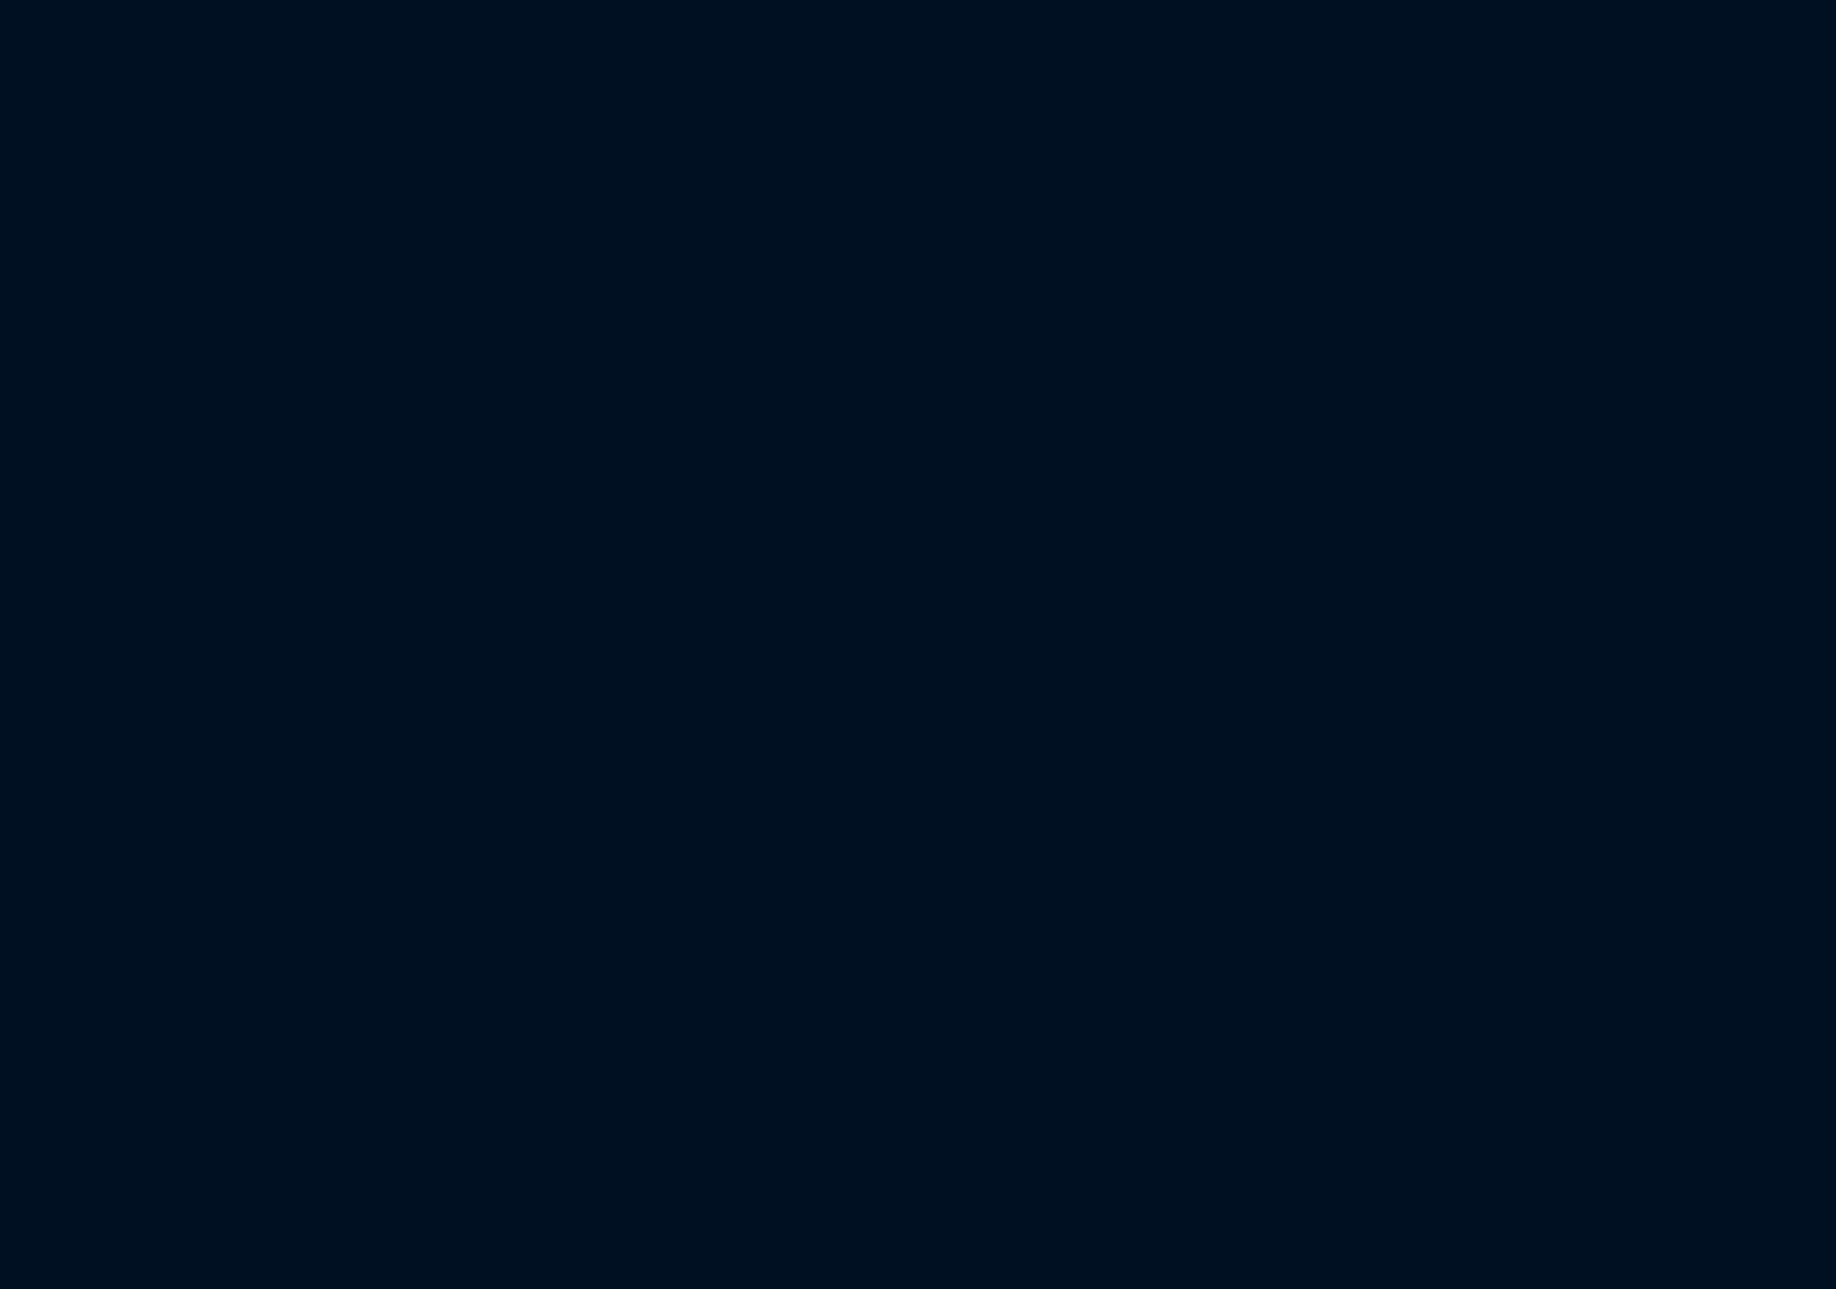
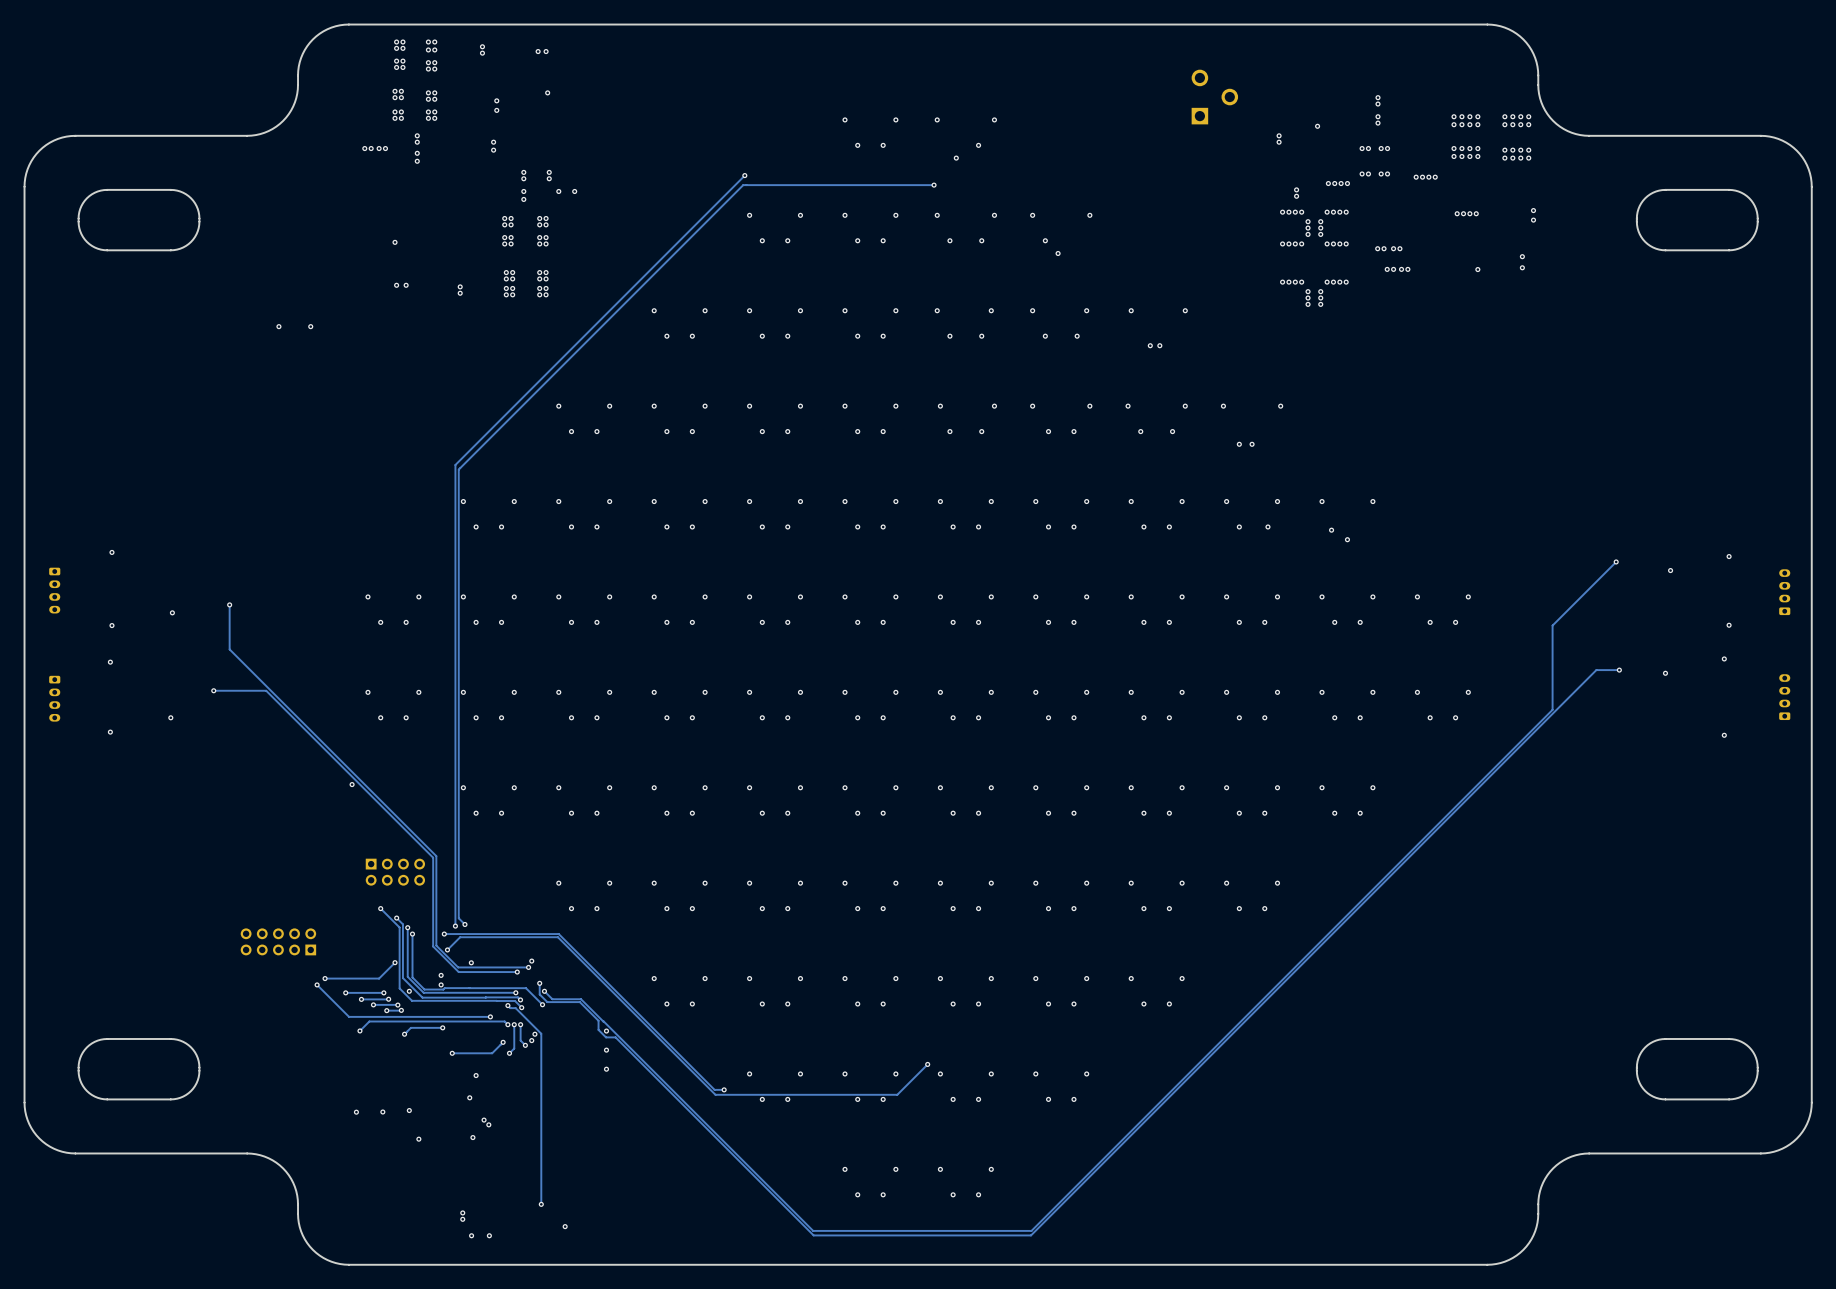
board edge: none -> (1487, 24) (344, 24) (323, 31) (307, 46) (299, 62) (297, 93) (293, 106) (283, 120) (264, 132) (247, 135) (70, 136) (58, 138) (46, 145) (36, 154) (29, 165) (24, 186) (24, 1102) (26, 1115) (33, 1131) (49, 1146) (70, 1153) (247, 1153) (268, 1158) (283, 1168) (293, 1182) (297, 1195) (299, 1227) (307, 1243) (316, 1252) (327, 1260) (348, 1264) (1491, 1264) (1512, 1257) (1529, 1243) (1536, 1227) (1539, 1195) (1543, 1182) (1556, 1165) (1571, 1156) (1589, 1153) (1765, 1153) (1778, 1150) (1790, 1144) (1804, 1128) (1810, 1115) (1811, 1102) (1811, 186) (1810, 173) (1804, 161) (1793, 147) (1782, 140) (1769, 136) (1589, 135) (1567, 131) (1553, 120) (1543, 106) (1539, 93) (1536, 62) (1529, 46) (1520, 36) (1508, 29) (1487, 24)
via: none -> (396, 42)
via: none -> (402, 42)
via: none -> (428, 42)
via: none -> (434, 42)
via: none -> (482, 46)
via: none -> (396, 48)
via: none -> (402, 48)
via: none -> (428, 49)
via: none -> (434, 49)
via: none -> (538, 51)
via: none -> (546, 51)
via: none -> (482, 53)
via: none -> (396, 61)
via: none -> (402, 61)
via: none -> (428, 62)
via: none -> (434, 62)
via: none -> (396, 67)
via: none -> (402, 67)
via: none -> (428, 69)
via: none -> (434, 69)
via: none -> (395, 91)
via: none -> (401, 91)
via: none -> (428, 92)
via: none -> (434, 92)
via: none -> (547, 92)
via: none -> (395, 97)
via: none -> (401, 97)
part: none -> (1214, 97)
via: none -> (1377, 97)
via: none -> (428, 99)
via: none -> (434, 99)
via: none -> (496, 100)
via: none -> (1377, 104)
via: none -> (496, 110)
via: none -> (395, 111)
via: none -> (401, 111)
via: none -> (428, 111)
via: none -> (434, 111)
via: none -> (1377, 116)
via: none -> (1454, 116)
via: none -> (1461, 116)
via: none -> (1469, 116)
via: none -> (1477, 116)
via: none -> (1504, 116)
via: none -> (1512, 116)
via: none -> (1520, 116)
via: none -> (1528, 116)
via: none -> (395, 118)
via: none -> (401, 118)
via: none -> (428, 118)
via: none -> (434, 118)
via: none -> (845, 119)
via: none -> (895, 119)
via: none -> (937, 119)
via: none -> (994, 119)
via: none -> (1377, 123)
via: none -> (1454, 124)
via: none -> (1461, 124)
via: none -> (1469, 124)
via: none -> (1477, 124)
via: none -> (1504, 124)
via: none -> (1512, 124)
via: none -> (1520, 124)
via: none -> (1528, 124)
via: none -> (1317, 126)
via: none -> (417, 135)
via: none -> (1279, 135)
via: none -> (417, 142)
via: none -> (493, 142)
via: none -> (1279, 142)
via: none -> (857, 145)
via: none -> (883, 145)
via: none -> (978, 145)
via: none -> (364, 148)
via: none -> (371, 148)
via: none -> (379, 148)
via: none -> (385, 148)
via: none -> (1362, 148)
via: none -> (1368, 148)
via: none -> (1381, 148)
via: none -> (1387, 148)
via: none -> (1454, 148)
via: none -> (1461, 148)
via: none -> (1469, 148)
via: none -> (1477, 148)
via: none -> (493, 150)
via: none -> (1504, 150)
via: none -> (1512, 150)
via: none -> (1520, 150)
via: none -> (1528, 150)
via: none -> (417, 153)
via: none -> (1454, 156)
via: none -> (1461, 156)
via: none -> (1469, 156)
via: none -> (1477, 156)
via: none -> (956, 158)
via: none -> (1504, 158)
via: none -> (1512, 158)
via: none -> (1520, 158)
via: none -> (1528, 158)
via: none -> (417, 161)
via: none -> (523, 172)
via: none -> (549, 172)
via: none -> (1362, 173)
via: none -> (1368, 173)
via: none -> (1381, 173)
via: none -> (1387, 173)
track: none -> (744, 175) (455, 464) (455, 926)
via: none -> (744, 175)
via: none -> (1416, 177)
via: none -> (1422, 177)
via: none -> (1428, 177)
via: none -> (1435, 177)
via: none -> (523, 178)
via: none -> (549, 178)
via: none -> (1328, 183)
via: none -> (1334, 183)
via: none -> (1341, 183)
via: none -> (1347, 183)
track: none -> (934, 185) (743, 185) (458, 469) (458, 918) (464, 924)
via: none -> (934, 185)
board edge: none -> (170, 189) (107, 189) (94, 192) (86, 198) (80, 209) (78, 221) (81, 234) (89, 244) (104, 250) (170, 250) (183, 247) (191, 241) (196, 234) (199, 224) (198, 212) (195, 203) (188, 196) (180, 191) (170, 189)
via: none -> (1296, 189)
board edge: none -> (1729, 189) (1665, 189) (1653, 192) (1643, 200) (1638, 209) (1636, 221) (1639, 234) (1647, 244) (1662, 250) (1729, 250) (1741, 247) (1749, 241) (1754, 234) (1757, 224) (1756, 212) (1753, 203) (1746, 196) (1738, 191) (1729, 189)
via: none -> (523, 191)
via: none -> (558, 191)
via: none -> (574, 191)
via: none -> (1296, 196)
via: none -> (523, 199)
via: none -> (1533, 210)
via: none -> (1282, 212)
via: none -> (1288, 212)
via: none -> (1295, 212)
via: none -> (1301, 212)
via: none -> (1327, 212)
via: none -> (1333, 212)
via: none -> (1339, 212)
via: none -> (1346, 212)
via: none -> (1457, 213)
via: none -> (1463, 213)
via: none -> (1469, 213)
via: none -> (1476, 213)
via: none -> (749, 215)
via: none -> (800, 215)
via: none -> (845, 215)
via: none -> (895, 215)
via: none -> (937, 215)
via: none -> (994, 215)
via: none -> (1032, 215)
via: none -> (1089, 215)
via: none -> (504, 218)
via: none -> (511, 218)
via: none -> (539, 218)
via: none -> (546, 218)
via: none -> (1533, 220)
via: none -> (1308, 221)
via: none -> (1320, 221)
via: none -> (504, 224)
via: none -> (511, 224)
via: none -> (539, 224)
via: none -> (546, 224)
via: none -> (1308, 228)
via: none -> (1320, 228)
via: none -> (1308, 234)
via: none -> (1320, 234)
via: none -> (504, 237)
via: none -> (511, 237)
via: none -> (539, 237)
via: none -> (546, 237)
via: none -> (762, 240)
via: none -> (787, 240)
via: none -> (857, 240)
via: none -> (883, 240)
via: none -> (949, 240)
via: none -> (981, 240)
via: none -> (1045, 240)
via: none -> (395, 242)
via: none -> (504, 243)
via: none -> (511, 243)
via: none -> (539, 243)
via: none -> (546, 243)
via: none -> (1282, 243)
via: none -> (1288, 243)
via: none -> (1295, 243)
via: none -> (1301, 243)
via: none -> (1327, 243)
via: none -> (1333, 243)
via: none -> (1339, 243)
via: none -> (1346, 243)
via: none -> (1377, 248)
via: none -> (1384, 248)
via: none -> (1393, 248)
via: none -> (1399, 248)
via: none -> (1058, 253)
via: none -> (1522, 256)
via: none -> (1522, 267)
via: none -> (1387, 269)
via: none -> (1393, 269)
via: none -> (1401, 269)
via: none -> (1407, 269)
via: none -> (1477, 269)
via: none -> (506, 272)
via: none -> (512, 272)
via: none -> (539, 272)
via: none -> (546, 272)
via: none -> (506, 278)
via: none -> (512, 278)
via: none -> (539, 278)
via: none -> (546, 278)
via: none -> (1282, 282)
via: none -> (1288, 282)
via: none -> (1295, 282)
via: none -> (1301, 282)
via: none -> (1327, 282)
via: none -> (1333, 282)
via: none -> (1339, 282)
via: none -> (1346, 282)
via: none -> (396, 285)
via: none -> (406, 285)
via: none -> (460, 286)
via: none -> (506, 288)
via: none -> (512, 288)
via: none -> (539, 288)
via: none -> (546, 288)
via: none -> (1308, 291)
via: none -> (1320, 291)
via: none -> (460, 293)
via: none -> (506, 294)
via: none -> (512, 294)
via: none -> (539, 294)
via: none -> (546, 294)
via: none -> (1308, 298)
via: none -> (1320, 298)
via: none -> (1308, 304)
via: none -> (1320, 304)
via: none -> (654, 310)
via: none -> (705, 310)
via: none -> (749, 310)
via: none -> (800, 310)
via: none -> (845, 310)
via: none -> (895, 310)
via: none -> (937, 310)
via: none -> (991, 310)
via: none -> (1032, 310)
via: none -> (1086, 310)
via: none -> (1131, 310)
via: none -> (1185, 310)
via: none -> (278, 326)
via: none -> (310, 326)
via: none -> (666, 336)
via: none -> (692, 336)
via: none -> (762, 336)
via: none -> (787, 336)
via: none -> (857, 336)
via: none -> (883, 336)
via: none -> (949, 336)
via: none -> (981, 336)
via: none -> (1045, 336)
via: none -> (1077, 336)
via: none -> (1150, 345)
via: none -> (1159, 345)
via: none -> (558, 406)
via: none -> (609, 406)
via: none -> (654, 406)
via: none -> (705, 406)
via: none -> (749, 406)
via: none -> (800, 406)
via: none -> (845, 406)
via: none -> (895, 406)
via: none -> (940, 406)
via: none -> (994, 406)
via: none -> (1032, 406)
via: none -> (1089, 406)
via: none -> (1128, 406)
via: none -> (1185, 406)
via: none -> (1223, 406)
via: none -> (1280, 406)
via: none -> (571, 431)
via: none -> (596, 431)
via: none -> (666, 431)
via: none -> (692, 431)
via: none -> (762, 431)
via: none -> (787, 431)
via: none -> (857, 431)
via: none -> (883, 431)
via: none -> (949, 431)
via: none -> (981, 431)
via: none -> (1048, 431)
via: none -> (1073, 431)
via: none -> (1140, 431)
via: none -> (1172, 431)
via: none -> (1239, 444)
via: none -> (1252, 444)
via: none -> (463, 501)
via: none -> (514, 501)
via: none -> (558, 501)
via: none -> (609, 501)
via: none -> (654, 501)
via: none -> (705, 501)
via: none -> (749, 501)
via: none -> (800, 501)
via: none -> (845, 501)
via: none -> (895, 501)
via: none -> (940, 501)
via: none -> (991, 501)
via: none -> (1035, 501)
via: none -> (1086, 501)
via: none -> (1131, 501)
via: none -> (1182, 501)
via: none -> (1226, 501)
via: none -> (1277, 501)
via: none -> (1322, 501)
via: none -> (1372, 501)
via: none -> (476, 526)
via: none -> (501, 526)
via: none -> (571, 526)
via: none -> (596, 526)
via: none -> (666, 526)
via: none -> (692, 526)
via: none -> (762, 526)
via: none -> (787, 526)
via: none -> (857, 526)
via: none -> (883, 526)
via: none -> (953, 526)
via: none -> (978, 526)
via: none -> (1048, 526)
via: none -> (1073, 526)
via: none -> (1143, 526)
via: none -> (1169, 526)
via: none -> (1239, 526)
via: none -> (1267, 526)
via: none -> (1331, 530)
via: none -> (1347, 539)
via: none -> (111, 552)
via: none -> (1729, 556)
track: none -> (1616, 561) (1552, 625) (1552, 709) (1031, 1230) (813, 1230) (581, 999) (552, 999) (544, 991)
via: none -> (1616, 561)
via: none -> (1670, 570)
part: none -> (54, 590)
part: none -> (1784, 592)
via: none -> (367, 596)
via: none -> (418, 596)
via: none -> (463, 596)
via: none -> (514, 596)
via: none -> (558, 596)
via: none -> (609, 596)
via: none -> (654, 596)
via: none -> (705, 596)
via: none -> (749, 596)
via: none -> (800, 596)
via: none -> (845, 596)
via: none -> (895, 596)
via: none -> (940, 596)
via: none -> (991, 596)
via: none -> (1035, 596)
via: none -> (1086, 596)
via: none -> (1131, 596)
via: none -> (1182, 596)
via: none -> (1226, 596)
via: none -> (1277, 596)
via: none -> (1322, 596)
via: none -> (1372, 596)
via: none -> (1417, 596)
via: none -> (1468, 596)
track: none -> (229, 604) (229, 649) (436, 856) (436, 945) (458, 967) (528, 967)
via: none -> (229, 604)
via: none -> (172, 612)
via: none -> (380, 622)
via: none -> (406, 622)
via: none -> (476, 622)
via: none -> (501, 622)
via: none -> (571, 622)
via: none -> (596, 622)
via: none -> (666, 622)
via: none -> (692, 622)
via: none -> (762, 622)
via: none -> (787, 622)
via: none -> (857, 622)
via: none -> (883, 622)
via: none -> (953, 622)
via: none -> (978, 622)
via: none -> (1048, 622)
via: none -> (1073, 622)
via: none -> (1143, 622)
via: none -> (1169, 622)
via: none -> (1239, 622)
via: none -> (1264, 622)
via: none -> (1334, 622)
via: none -> (1360, 622)
via: none -> (1430, 622)
via: none -> (1455, 622)
via: none -> (111, 625)
via: none -> (1729, 625)
via: none -> (1724, 658)
via: none -> (110, 662)
track: none -> (1619, 670) (1596, 670) (1031, 1235) (813, 1235) (615, 1037) (606, 1037) (598, 1029) (598, 1020) (579, 1002) (547, 1002) (539, 994) (539, 983)
via: none -> (1619, 670)
via: none -> (1665, 673)
track: none -> (213, 690) (266, 690) (433, 857) (433, 946) (458, 972) (517, 972)
via: none -> (213, 690)
via: none -> (367, 692)
via: none -> (418, 692)
via: none -> (463, 692)
via: none -> (514, 692)
via: none -> (558, 692)
via: none -> (609, 692)
via: none -> (654, 692)
via: none -> (705, 692)
via: none -> (749, 692)
via: none -> (800, 692)
via: none -> (845, 692)
via: none -> (895, 692)
via: none -> (940, 692)
via: none -> (991, 692)
via: none -> (1035, 692)
via: none -> (1086, 692)
via: none -> (1131, 692)
via: none -> (1182, 692)
via: none -> (1226, 692)
via: none -> (1277, 692)
via: none -> (1322, 692)
via: none -> (1372, 692)
via: none -> (1417, 692)
via: none -> (1468, 692)
part: none -> (1784, 697)
part: none -> (54, 698)
via: none -> (170, 717)
via: none -> (380, 717)
via: none -> (406, 717)
via: none -> (476, 717)
via: none -> (501, 717)
via: none -> (571, 717)
via: none -> (596, 717)
via: none -> (666, 717)
via: none -> (692, 717)
via: none -> (762, 717)
via: none -> (787, 717)
via: none -> (857, 717)
via: none -> (883, 717)
via: none -> (953, 717)
via: none -> (978, 717)
via: none -> (1048, 717)
via: none -> (1073, 717)
via: none -> (1143, 717)
via: none -> (1169, 717)
via: none -> (1239, 717)
via: none -> (1264, 717)
via: none -> (1334, 717)
via: none -> (1360, 717)
via: none -> (1430, 717)
via: none -> (1455, 717)
via: none -> (110, 732)
via: none -> (1724, 735)
via: none -> (352, 784)
via: none -> (463, 787)
via: none -> (514, 787)
via: none -> (558, 787)
via: none -> (609, 787)
via: none -> (654, 787)
via: none -> (705, 787)
via: none -> (749, 787)
via: none -> (800, 787)
via: none -> (845, 787)
via: none -> (895, 787)
via: none -> (940, 787)
via: none -> (991, 787)
via: none -> (1035, 787)
via: none -> (1086, 787)
via: none -> (1131, 787)
via: none -> (1182, 787)
via: none -> (1226, 787)
via: none -> (1277, 787)
via: none -> (1322, 787)
via: none -> (1372, 787)
via: none -> (476, 813)
via: none -> (501, 813)
via: none -> (571, 813)
via: none -> (596, 813)
via: none -> (666, 813)
via: none -> (692, 813)
via: none -> (762, 813)
via: none -> (787, 813)
via: none -> (857, 813)
via: none -> (883, 813)
via: none -> (953, 813)
via: none -> (978, 813)
via: none -> (1048, 813)
via: none -> (1073, 813)
via: none -> (1143, 813)
via: none -> (1169, 813)
via: none -> (1239, 813)
via: none -> (1264, 813)
via: none -> (1334, 813)
via: none -> (1360, 813)
part: none -> (395, 872)
via: none -> (558, 883)
via: none -> (609, 883)
via: none -> (654, 883)
via: none -> (705, 883)
via: none -> (749, 883)
via: none -> (800, 883)
via: none -> (845, 883)
via: none -> (895, 883)
via: none -> (940, 883)
via: none -> (991, 883)
via: none -> (1035, 883)
via: none -> (1086, 883)
via: none -> (1131, 883)
via: none -> (1182, 883)
via: none -> (1226, 883)
via: none -> (1277, 883)
track: none -> (380, 908) (399, 927) (399, 988) (412, 1000) (515, 1000) (521, 1007)
via: none -> (380, 908)
via: none -> (571, 908)
via: none -> (596, 908)
via: none -> (666, 908)
via: none -> (692, 908)
via: none -> (762, 908)
via: none -> (787, 908)
via: none -> (857, 908)
via: none -> (883, 908)
via: none -> (953, 908)
via: none -> (978, 908)
via: none -> (1048, 908)
via: none -> (1073, 908)
via: none -> (1143, 908)
via: none -> (1169, 908)
via: none -> (1239, 908)
via: none -> (1264, 908)
track: none -> (396, 918) (402, 924) (402, 978) (422, 997) (517, 997) (520, 999)
via: none -> (396, 918)
via: none -> (464, 924)
via: none -> (455, 926)
track: none -> (407, 927) (407, 976) (423, 992) (515, 992)
via: none -> (407, 927)
track: none -> (412, 934) (412, 977) (424, 989) (469, 988)
via: none -> (412, 934)
track: none -> (444, 934) (558, 934) (714, 1089) (724, 1089)
via: none -> (444, 934)
part: none -> (278, 941)
track: none -> (447, 949) (460, 937) (557, 937) (715, 1094) (897, 1094) (927, 1064)
via: none -> (447, 949)
via: none -> (531, 961)
track: none -> (395, 962) (379, 978) (325, 978)
via: none -> (395, 962)
via: none -> (471, 962)
via: none -> (528, 967)
via: none -> (517, 972)
via: none -> (441, 975)
via: none -> (325, 978)
via: none -> (654, 978)
via: none -> (705, 978)
via: none -> (749, 978)
via: none -> (800, 978)
via: none -> (845, 978)
via: none -> (895, 978)
via: none -> (940, 978)
via: none -> (991, 978)
via: none -> (1035, 978)
via: none -> (1086, 978)
via: none -> (1131, 978)
via: none -> (1182, 978)
via: none -> (539, 983)
track: none -> (317, 984) (349, 1016) (490, 1016)
via: none -> (317, 984)
via: none -> (441, 984)
track: none -> (469, 988) (525, 988) (542, 1004)
via: none -> (409, 991)
via: none -> (544, 991)
via: none -> (345, 992)
track: none -> (383, 992) (345, 992)
via: none -> (383, 992)
via: none -> (515, 992)
via: none -> (361, 999)
track: none -> (388, 999) (361, 999)
via: none -> (388, 999)
via: none -> (520, 999)
track: none -> (373, 1004) (397, 1005)
via: none -> (373, 1004)
via: none -> (542, 1004)
via: none -> (666, 1004)
via: none -> (692, 1004)
via: none -> (762, 1004)
via: none -> (787, 1004)
via: none -> (857, 1004)
via: none -> (883, 1004)
via: none -> (953, 1004)
via: none -> (978, 1004)
via: none -> (1048, 1004)
via: none -> (1073, 1004)
via: none -> (1143, 1004)
via: none -> (1169, 1004)
via: none -> (397, 1005)
track: none -> (507, 1005) (510, 1008) (515, 1008) (541, 1033) (541, 1204)
via: none -> (507, 1005)
via: none -> (521, 1007)
via: none -> (386, 1010)
track: none -> (401, 1010) (386, 1010)
via: none -> (401, 1010)
via: none -> (490, 1016)
track: none -> (507, 1024) (504, 1021) (369, 1021) (359, 1030)
via: none -> (507, 1024)
track: none -> (514, 1024) (514, 1048) (509, 1053)
via: none -> (514, 1024)
track: none -> (520, 1024) (520, 1040) (525, 1045)
via: none -> (520, 1024)
track: none -> (442, 1027) (410, 1027) (404, 1034)
via: none -> (442, 1027)
via: none -> (359, 1030)
via: none -> (606, 1031)
via: none -> (404, 1034)
via: none -> (534, 1034)
board edge: none -> (170, 1038) (107, 1038) (94, 1041) (86, 1047) (80, 1058) (78, 1070) (81, 1083) (89, 1093) (104, 1099) (170, 1099) (183, 1096) (191, 1091) (196, 1083) (199, 1074) (198, 1061) (195, 1052) (188, 1045) (180, 1040) (170, 1038)
board edge: none -> (1729, 1038) (1665, 1038) (1653, 1041) (1643, 1049) (1638, 1058) (1636, 1070) (1639, 1083) (1650, 1095) (1662, 1099) (1729, 1099) (1741, 1096) (1749, 1091) (1754, 1083) (1757, 1074) (1756, 1061) (1753, 1052) (1746, 1045) (1738, 1040) (1729, 1038)
via: none -> (531, 1040)
track: none -> (503, 1042) (492, 1053) (452, 1053)
via: none -> (503, 1042)
via: none -> (525, 1045)
via: none -> (606, 1050)
via: none -> (452, 1053)
via: none -> (509, 1053)
via: none -> (927, 1064)
via: none -> (606, 1069)
via: none -> (749, 1073)
via: none -> (800, 1073)
via: none -> (845, 1073)
via: none -> (895, 1073)
via: none -> (940, 1073)
via: none -> (991, 1073)
via: none -> (1035, 1073)
via: none -> (1086, 1073)
via: none -> (476, 1075)
via: none -> (724, 1089)
via: none -> (469, 1097)
via: none -> (762, 1099)
via: none -> (787, 1099)
via: none -> (857, 1099)
via: none -> (883, 1099)
via: none -> (953, 1099)
via: none -> (978, 1099)
via: none -> (1048, 1099)
via: none -> (1073, 1099)
via: none -> (409, 1110)
via: none -> (356, 1112)
via: none -> (382, 1112)
via: none -> (484, 1120)
via: none -> (488, 1124)
via: none -> (472, 1137)
via: none -> (418, 1139)
via: none -> (845, 1169)
via: none -> (895, 1169)
via: none -> (940, 1169)
via: none -> (991, 1169)
via: none -> (857, 1194)
via: none -> (883, 1194)
via: none -> (953, 1194)
via: none -> (978, 1194)
via: none -> (541, 1204)
via: none -> (462, 1212)
via: none -> (462, 1219)
via: none -> (565, 1226)
via: none -> (471, 1235)
via: none -> (489, 1235)

